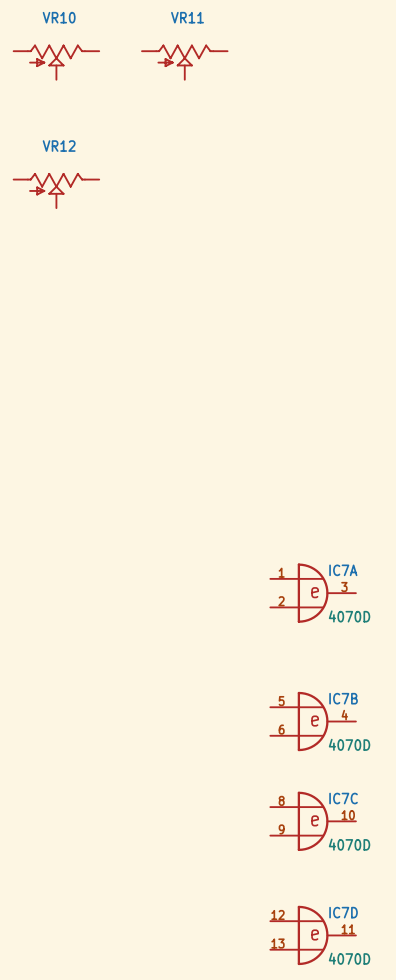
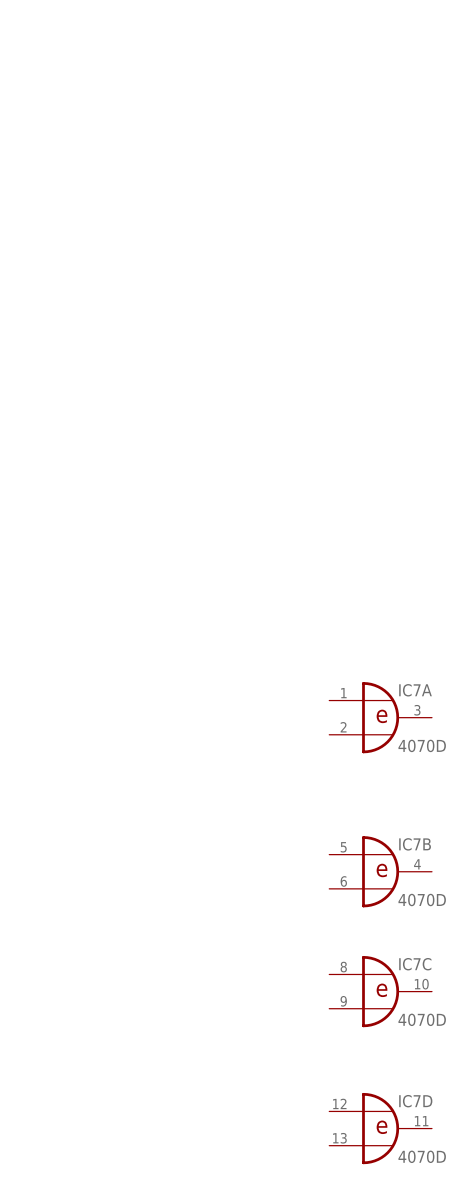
VR10: (56, 62) -> none
VR11: (184, 62) -> none
VR12: (56, 190) -> none

